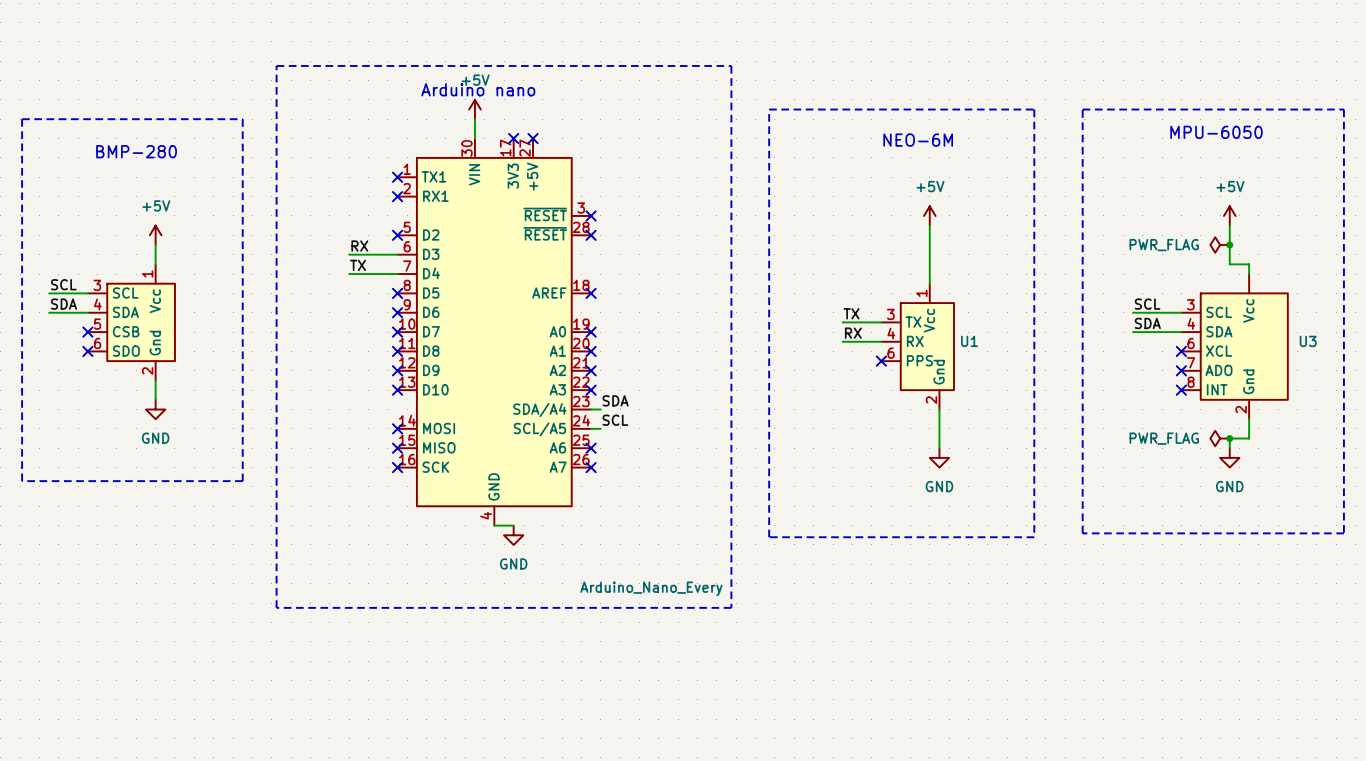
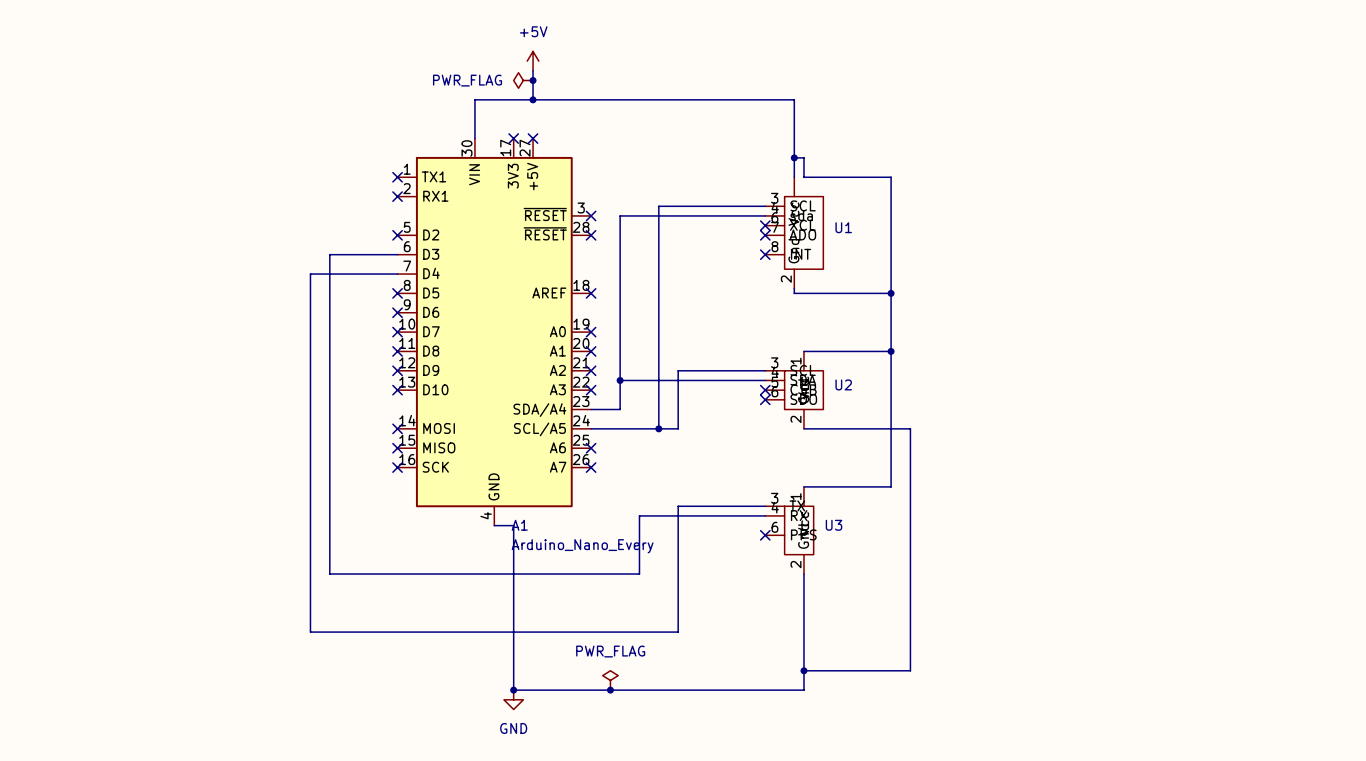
line: (276, 65) (731, 65) (731, 607) (276, 607) (276, 65) -> none
wire: none -> (533, 70) (533, 99)
power symbol: none -> PWR_FLAG (523, 80)
junction: none -> (533, 80)
text: Arduino nano (478, 89) -> none
junction: none -> (533, 99)
power symbol position: +5V (474, 109) -> +5V (533, 61)
line: (769, 109) (1034, 109) (1034, 537) (769, 537) (769, 109) -> none
line: (1082, 109) (1343, 109) (1343, 533) (1082, 533) (1082, 109) -> none
line: (22, 119) (242, 119) (242, 481) (22, 481) (22, 119) -> none
wire: none -> (474, 119) (474, 99) (794, 99) (794, 177)
text: MPU-6050 (1216, 132) -> none
text: NEO-6M (918, 140) -> none
text: BMP-280 (136, 151) -> none
wire: none -> (794, 157) (803, 157) (803, 177) (891, 177) (891, 486) (803, 486)
junction: none -> (794, 157)
wire: none -> (765, 206) (658, 206) (658, 428)
wire: none -> (765, 215) (620, 215) (620, 409) (600, 409)
power symbol: +5V (929, 215) -> none
power symbol: +5V (1229, 215) -> none
no-connect mark: none -> (765, 225)
wire: (929, 225) (929, 283) -> none
wire: (1229, 225) (1229, 264) (1249, 264) (1249, 274) -> none
power symbol: +5V (155, 235) -> none
no-connect mark: none -> (765, 235)
wire: (155, 245) (155, 264) -> none
power symbol: PWR_FLAG (1220, 245) -> none
junction: (1229, 245) -> none
label: RX (359, 246) -> none
wire: none -> (349, 254) (329, 254) (329, 574) (639, 574) (639, 515) (765, 515)
no-connect mark: none -> (765, 254)
label: TX (358, 265) -> none
wire: none -> (349, 274) (310, 274) (310, 632) (678, 632) (678, 506) (765, 506)
U3 symbol: [1181, 274, 1288, 420] -> [765, 486, 814, 575]
U1 symbol: [881, 283, 954, 410] -> [765, 177, 824, 289]
label: SCL (63, 284) -> none
wire: none -> (794, 288) (794, 293) (891, 293)
wire: (49, 293) (87, 293) -> none
junction: none -> (891, 293)
label: SDA (64, 304) -> none
label: SCL (1147, 304) -> none
wire: (49, 312) (87, 312) -> none
wire: (1132, 312) (1181, 312) -> none
label: TX (851, 313) -> none
part: (131, 322) -> none
wire: (842, 322) (881, 322) -> none
label: SDA (1147, 323) -> none
no-connect mark: (87, 332) -> none
wire: (1132, 332) (1181, 332) -> none
label: RX (853, 333) -> none
wire: (842, 341) (881, 341) -> none
U3 name position: U3 (1308, 341) -> U3 (834, 525)
no-connect mark: (87, 351) -> none
wire: none -> (803, 351) (891, 351)
junction: none -> (891, 351)
no-connect mark: (1181, 351) -> none
no-connect mark: (881, 361) -> none
wire: none -> (765, 370) (678, 370) (678, 428) (600, 428)
no-connect mark: (1181, 370) -> none
wire: (155, 380) (155, 399) -> none
wire: none -> (620, 380) (765, 380)
junction: none -> (620, 380)
no-connect mark: none -> (765, 390)
U2: none -> (794, 390)
no-connect mark: (1181, 390) -> none
no-connect mark: none -> (765, 399)
label: SDA (615, 400) -> none
power symbol: GND (155, 409) -> none
wire: (939, 409) (939, 448) -> none
wire: (1249, 419) (1249, 438) (1229, 438) (1229, 448) -> none
label: SCL (615, 420) -> none
junction: none -> (658, 428)
wire: none -> (803, 428) (910, 428) (910, 670) (803, 670)
power symbol: PWR_FLAG (1220, 438) -> none
junction: (1229, 438) -> none
power symbol: GND (939, 457) -> none
power symbol: GND (1229, 457) -> none
wire: none -> (513, 525) (513, 690) (803, 690) (803, 574)
A1 name: none -> A1 (519, 525)
power symbol position: GND (513, 535) -> GND (513, 699)
no-connect mark: none -> (765, 535)
A1 value position: Arduino_Nano_Every (651, 588) -> Arduino_Nano_Every (582, 546)
junction: none -> (803, 670)
power symbol: none -> PWR_FLAG (610, 680)
junction: none -> (513, 690)
junction: none -> (610, 690)

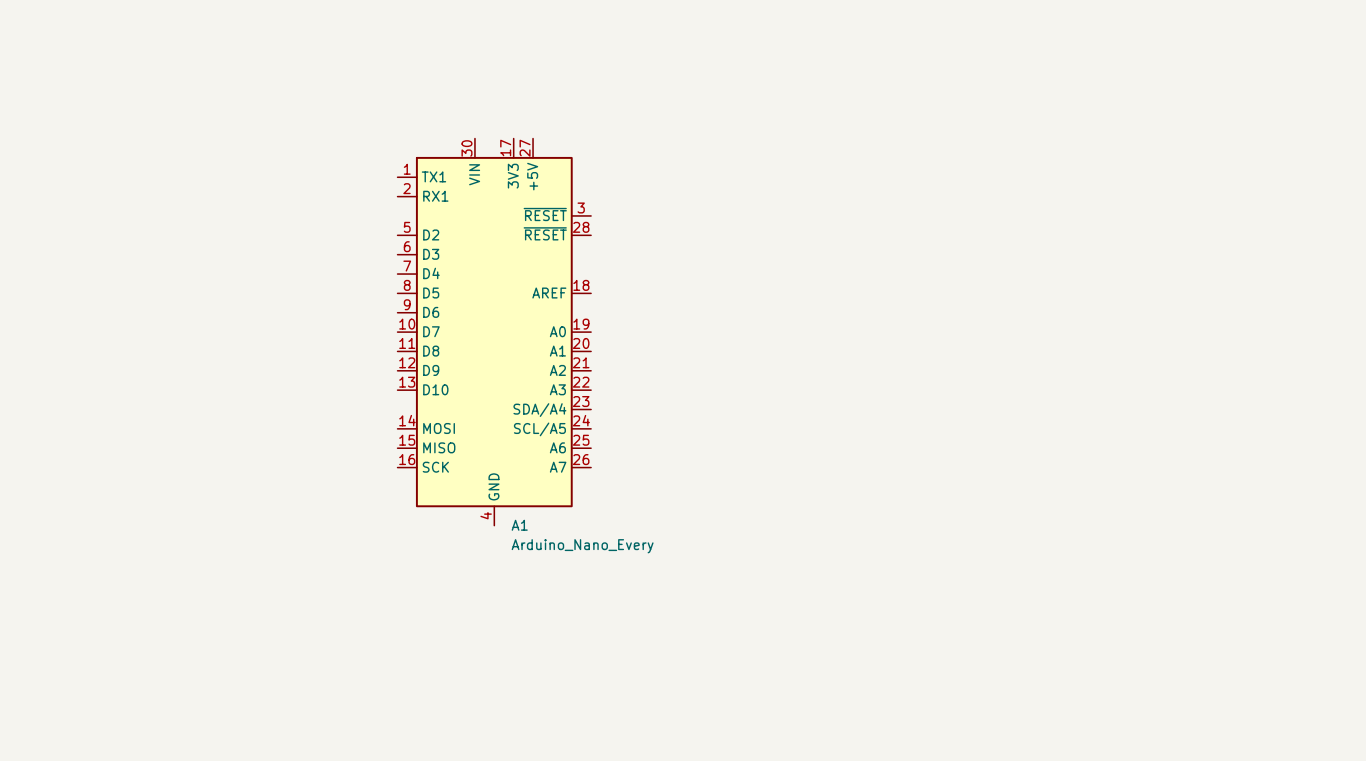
power symbol: +5V (533, 61) -> none
wire: (533, 70) (533, 99) -> none
power symbol: PWR_FLAG (523, 80) -> none
junction: (533, 80) -> none
junction: (533, 99) -> none
wire: (474, 138) (474, 99) (794, 99) (794, 177) -> none
no-connect mark: (513, 138) -> none
no-connect mark: (533, 138) -> none
wire: (794, 157) (803, 157) (803, 177) (891, 177) (891, 486) (803, 486) -> none
junction: (794, 157) -> none
no-connect mark: (397, 177) -> none
no-connect mark: (397, 196) -> none
wire: (765, 206) (658, 206) (658, 428) -> none
no-connect mark: (591, 215) -> none
wire: (765, 215) (620, 215) (620, 409) (591, 409) -> none
no-connect mark: (765, 225) -> none
U1: (794, 232) -> none
no-connect mark: (397, 235) -> none
no-connect mark: (591, 235) -> none
no-connect mark: (765, 235) -> none
wire: (397, 254) (329, 254) (329, 574) (639, 574) (639, 515) (765, 515) -> none
no-connect mark: (765, 254) -> none
wire: (397, 274) (310, 274) (310, 632) (678, 632) (678, 506) (765, 506) -> none
wire: (794, 288) (794, 293) (891, 293) -> none
no-connect mark: (397, 293) -> none
no-connect mark: (591, 293) -> none
junction: (891, 293) -> none
no-connect mark: (397, 312) -> none
no-connect mark: (397, 332) -> none
no-connect mark: (591, 332) -> none
no-connect mark: (397, 351) -> none
no-connect mark: (591, 351) -> none
wire: (803, 351) (891, 351) -> none
junction: (891, 351) -> none
no-connect mark: (397, 370) -> none
no-connect mark: (591, 370) -> none
wire: (765, 370) (678, 370) (678, 428) (591, 428) -> none
wire: (620, 380) (765, 380) -> none
junction: (620, 380) -> none
no-connect mark: (397, 390) -> none
no-connect mark: (591, 390) -> none
no-connect mark: (765, 390) -> none
U2: (794, 390) -> none
no-connect mark: (765, 399) -> none
no-connect mark: (397, 428) -> none
junction: (658, 428) -> none
wire: (803, 428) (910, 428) (910, 670) (803, 670) -> none
no-connect mark: (397, 448) -> none
no-connect mark: (591, 448) -> none
no-connect mark: (397, 467) -> none
no-connect mark: (591, 467) -> none
wire: (494, 525) (513, 525) (513, 690) (803, 690) (803, 574) -> none
U3: (789, 530) -> none
no-connect mark: (765, 535) -> none
junction: (803, 670) -> none
power symbol: PWR_FLAG (610, 680) -> none
junction: (513, 690) -> none
junction: (610, 690) -> none
power symbol: GND (513, 699) -> none

